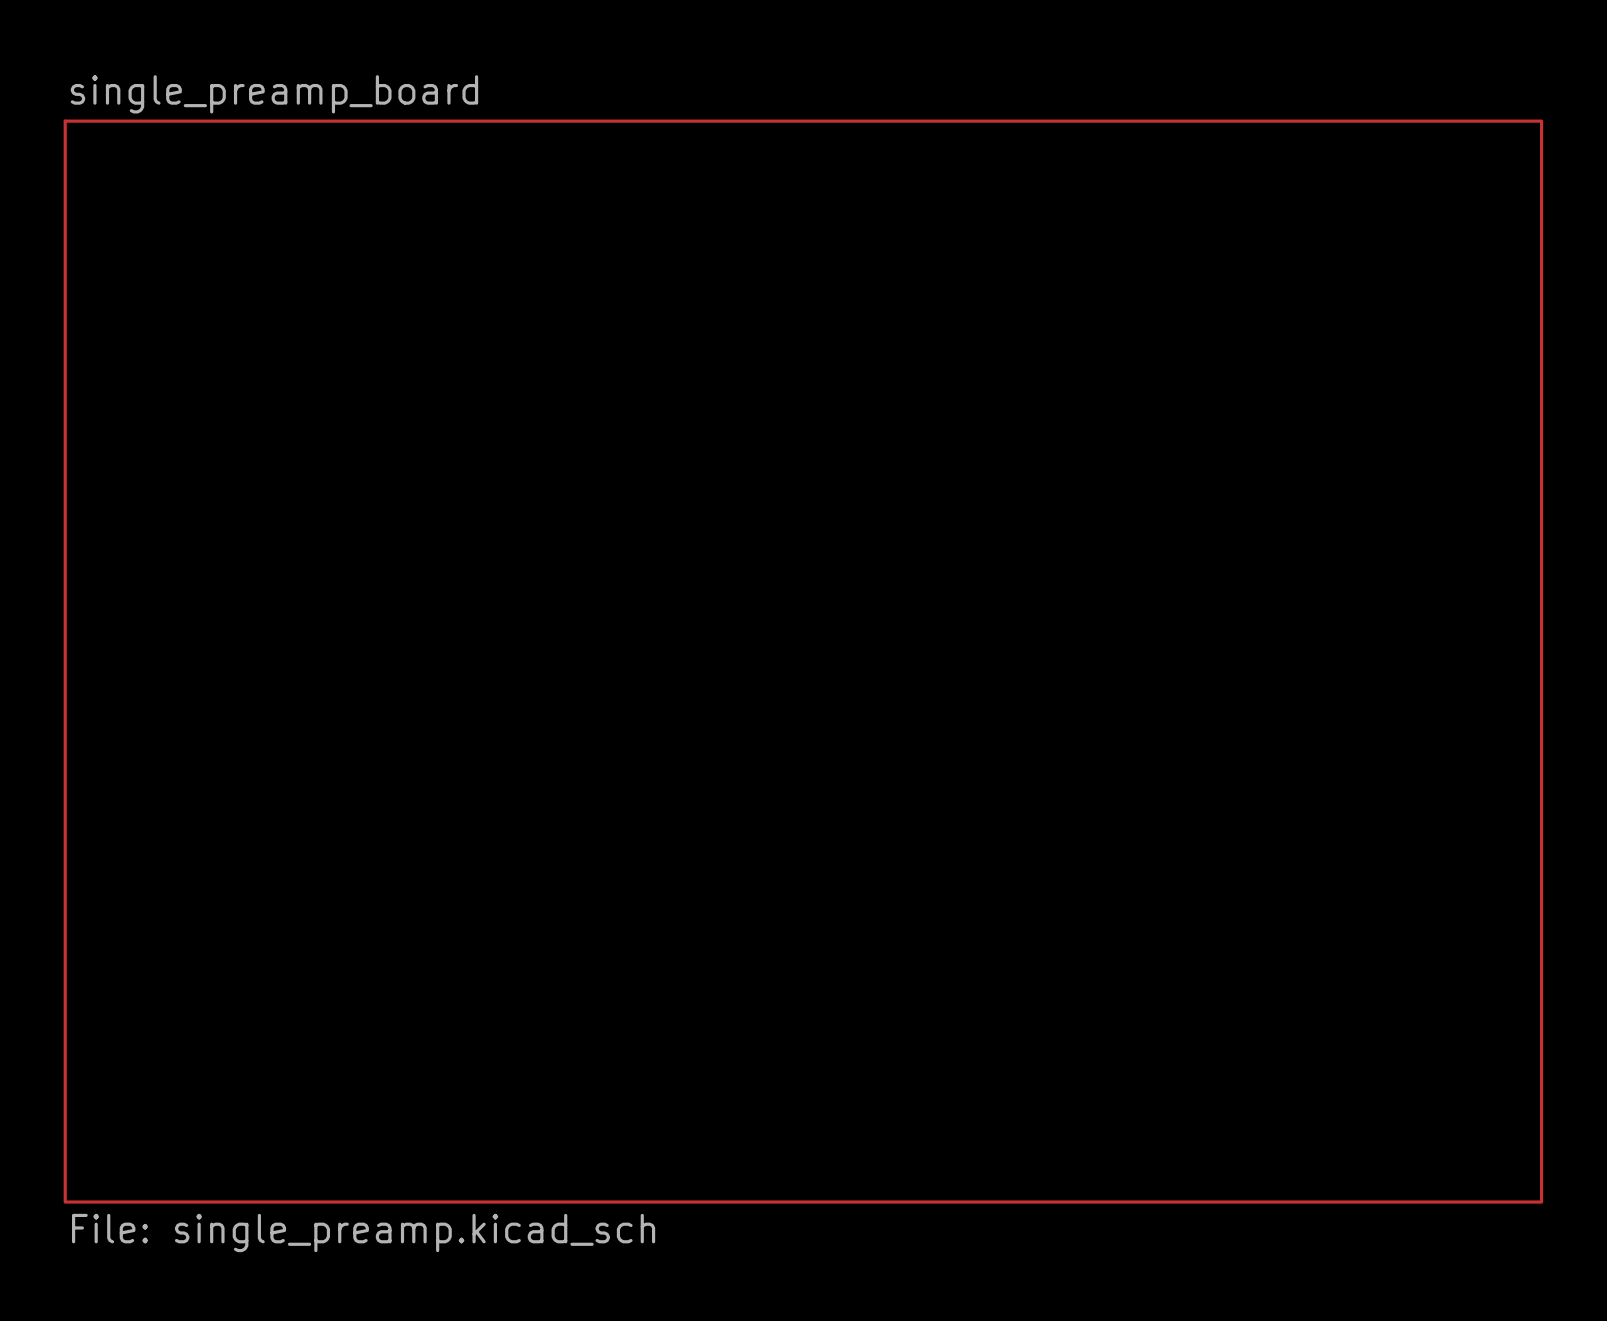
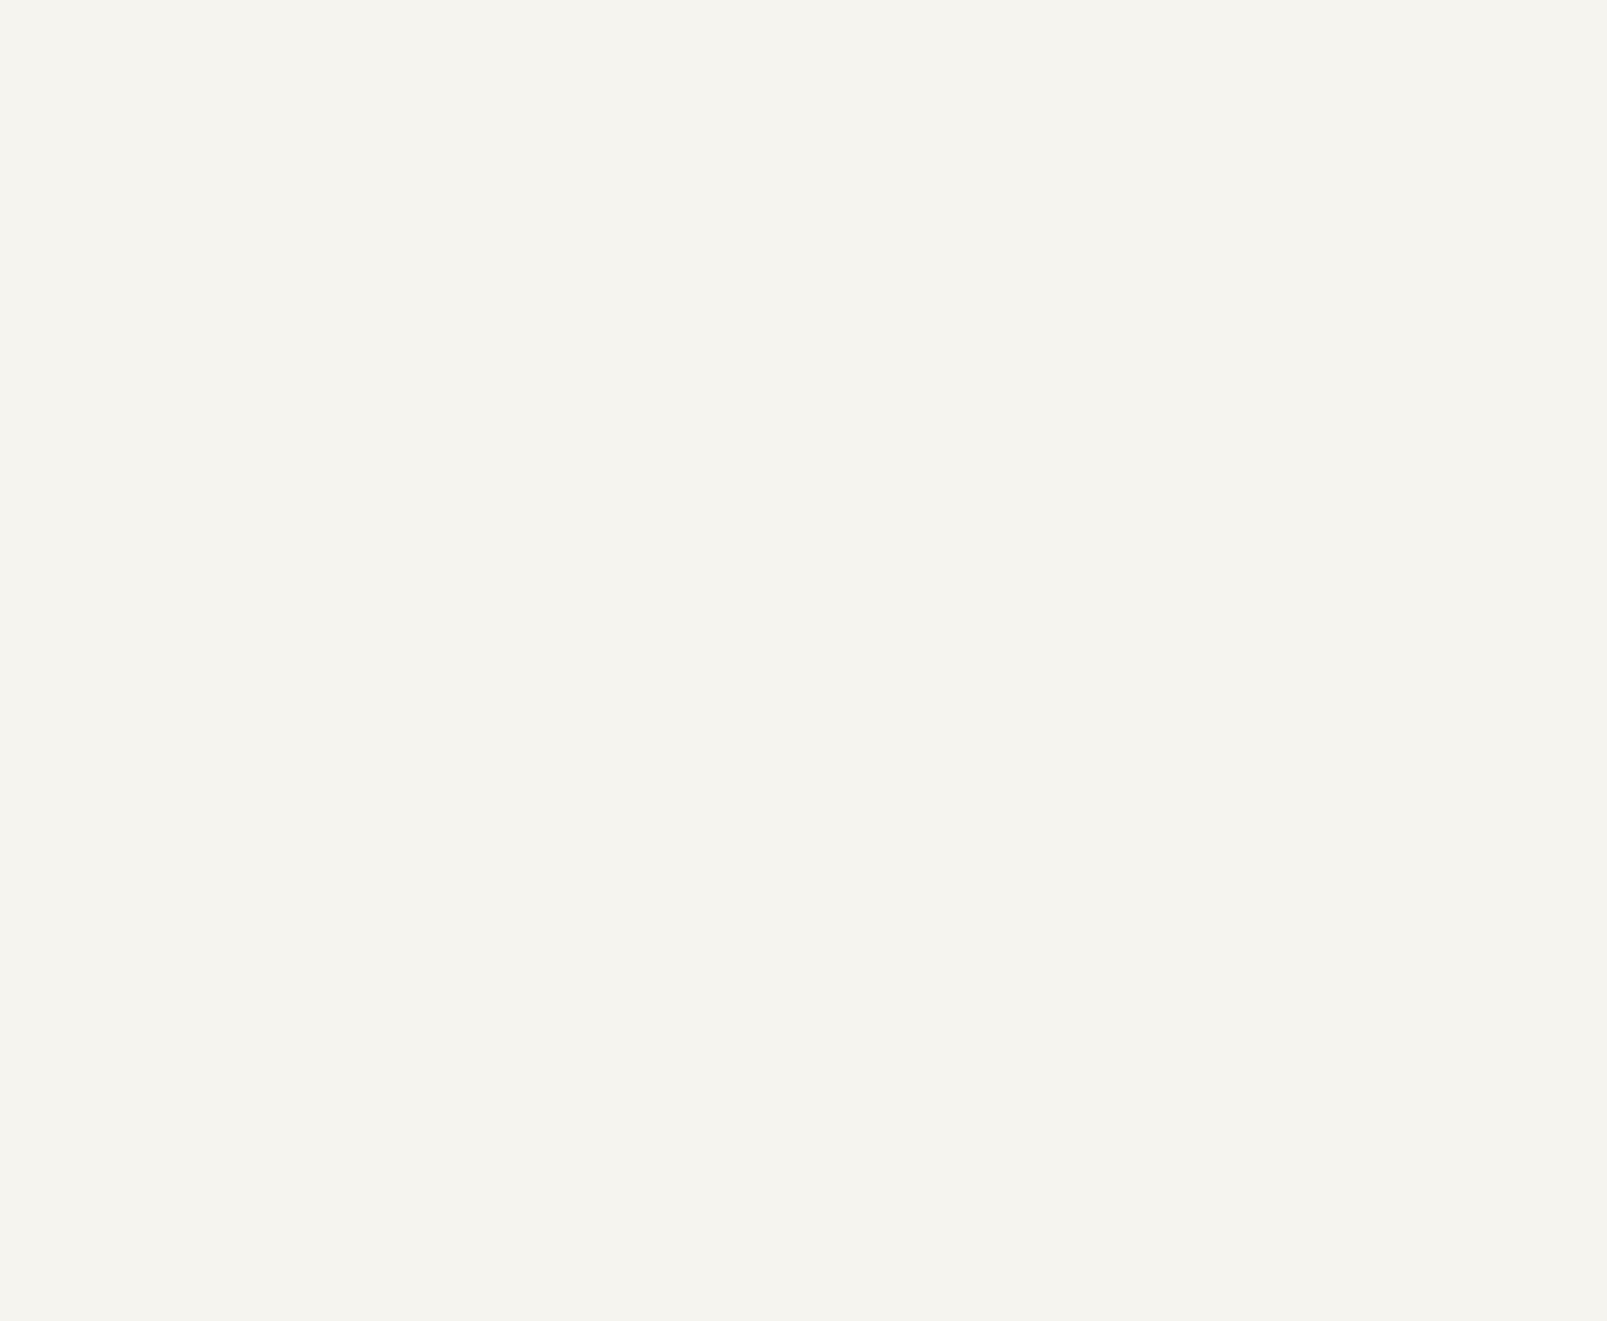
sheet single_preamp_board: File: single_preamp.kicad_sch (803, 661) -> none

